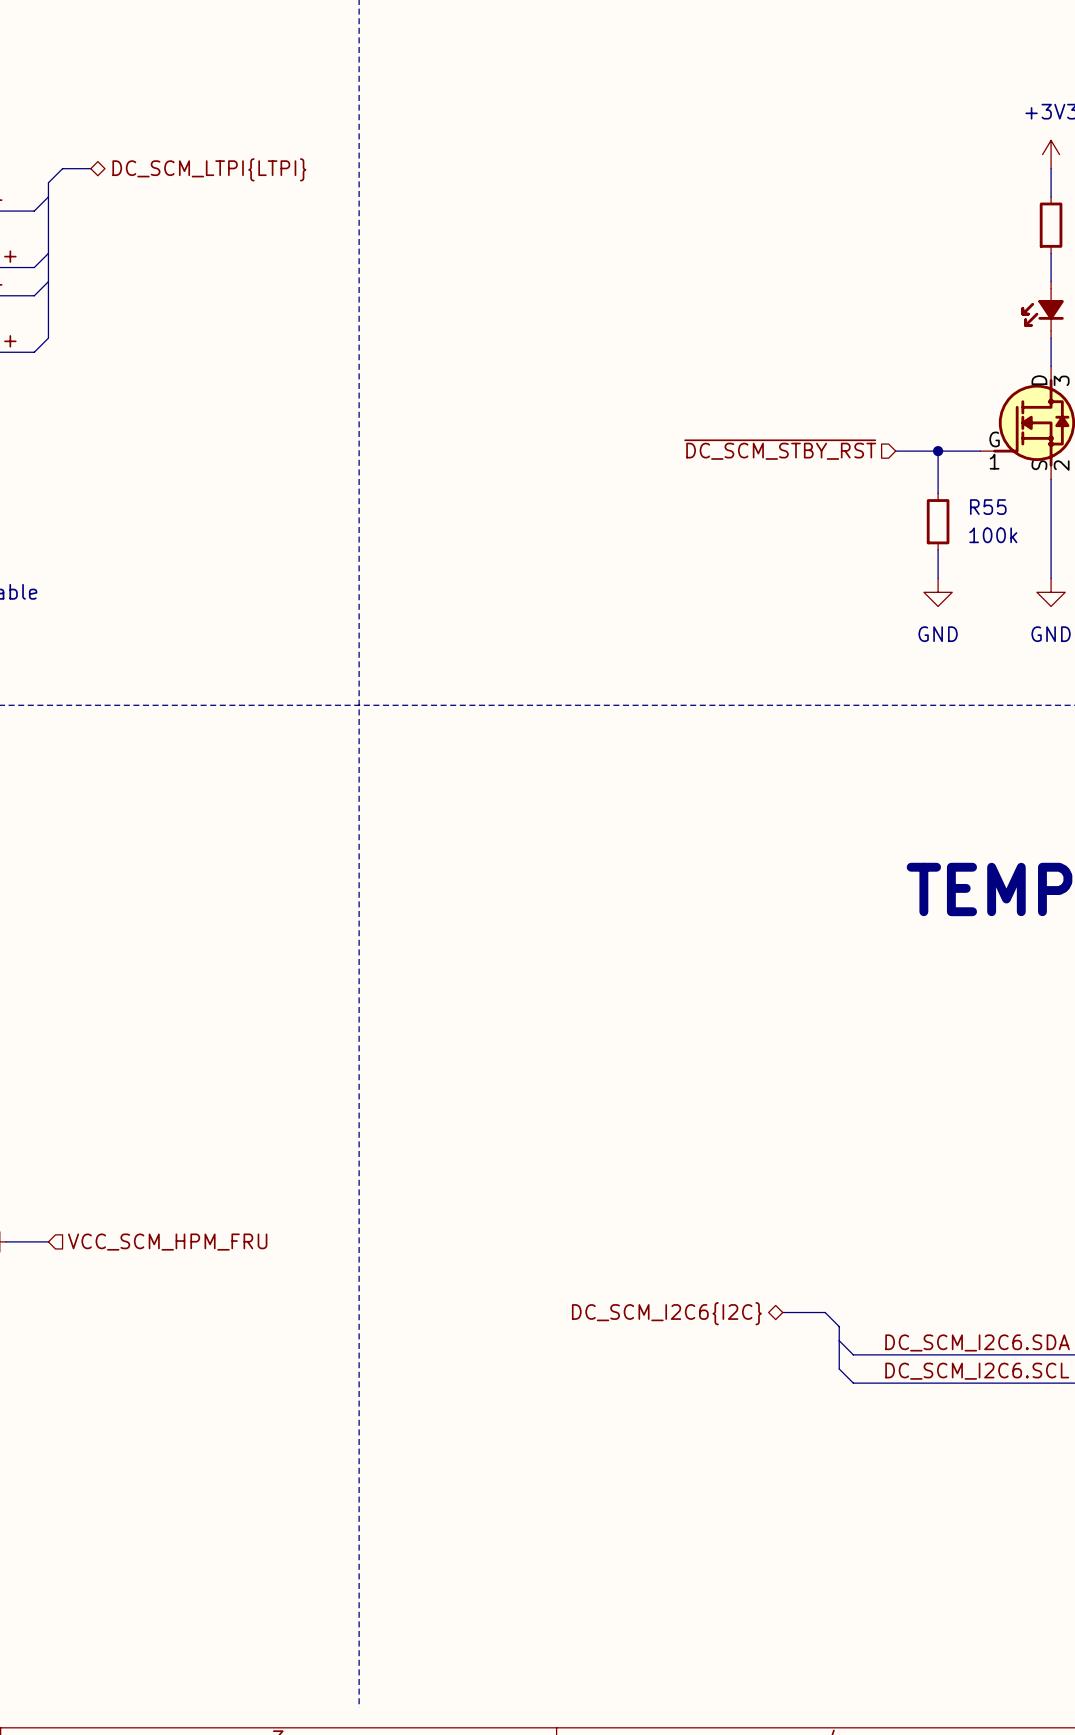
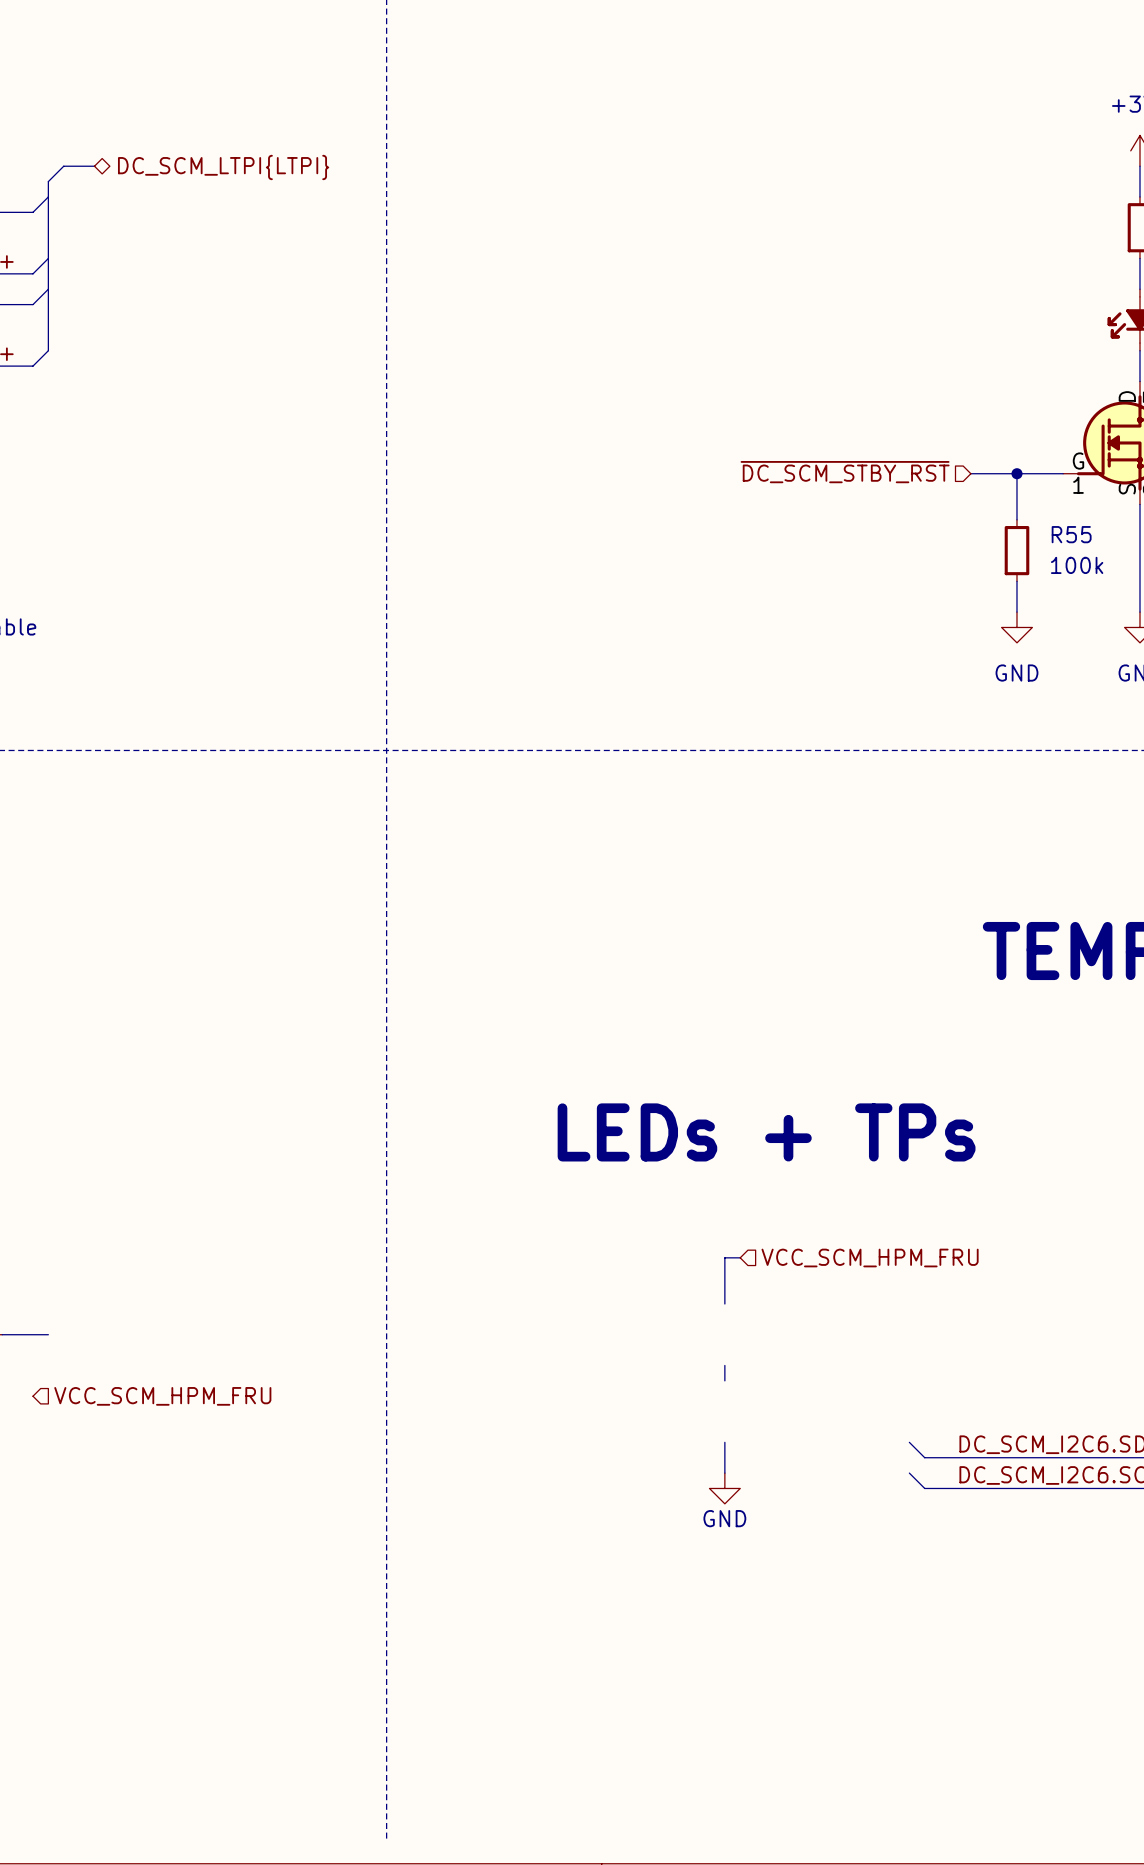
text: none -> LEDs + TPs (766, 1132)
wire: none -> (740, 1257) (724, 1257) (724, 1303)
hierarchical label: none -> VCC_SCM_HPM_FRU (870, 1258)
hierarchical label position: VCC_SCM_HPM_FRU (167, 1242) -> VCC_SCM_HPM_FRU (162, 1396)
wire: none -> (724, 1365) (724, 1380)
bus: (782, 1312) (825, 1312) (839, 1326) (839, 1369) -> none
hierarchical label: DC_SCM_I2C6{I2C} (666, 1313) -> none
wire: none -> (724, 1442) (724, 1473)
power symbol: none -> GND (724, 1488)

